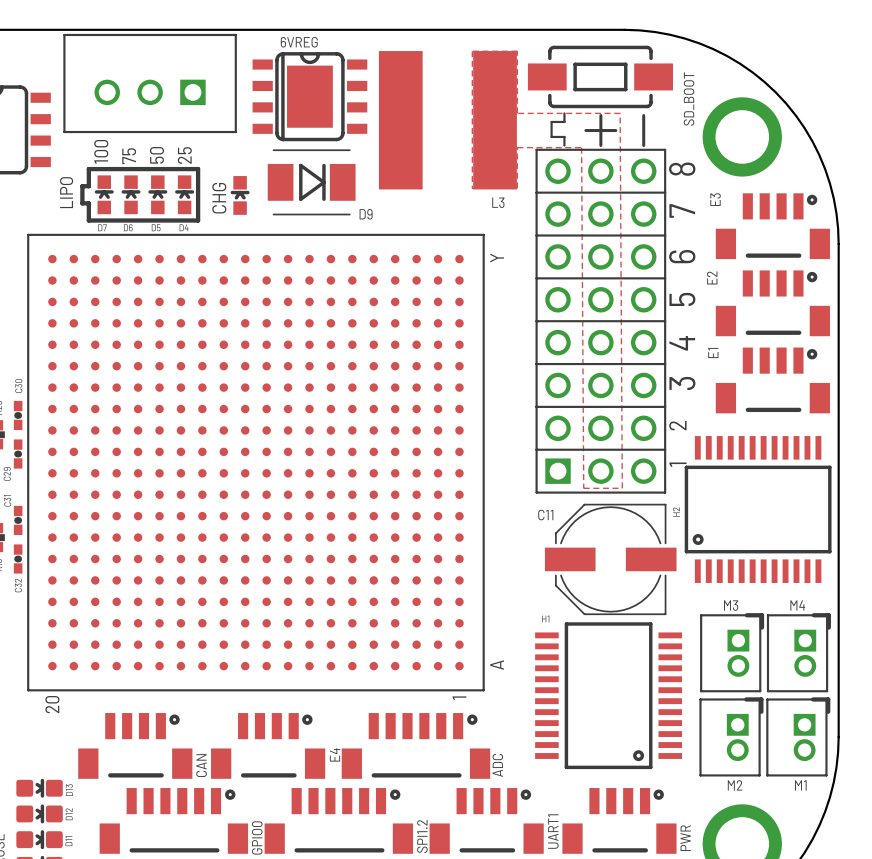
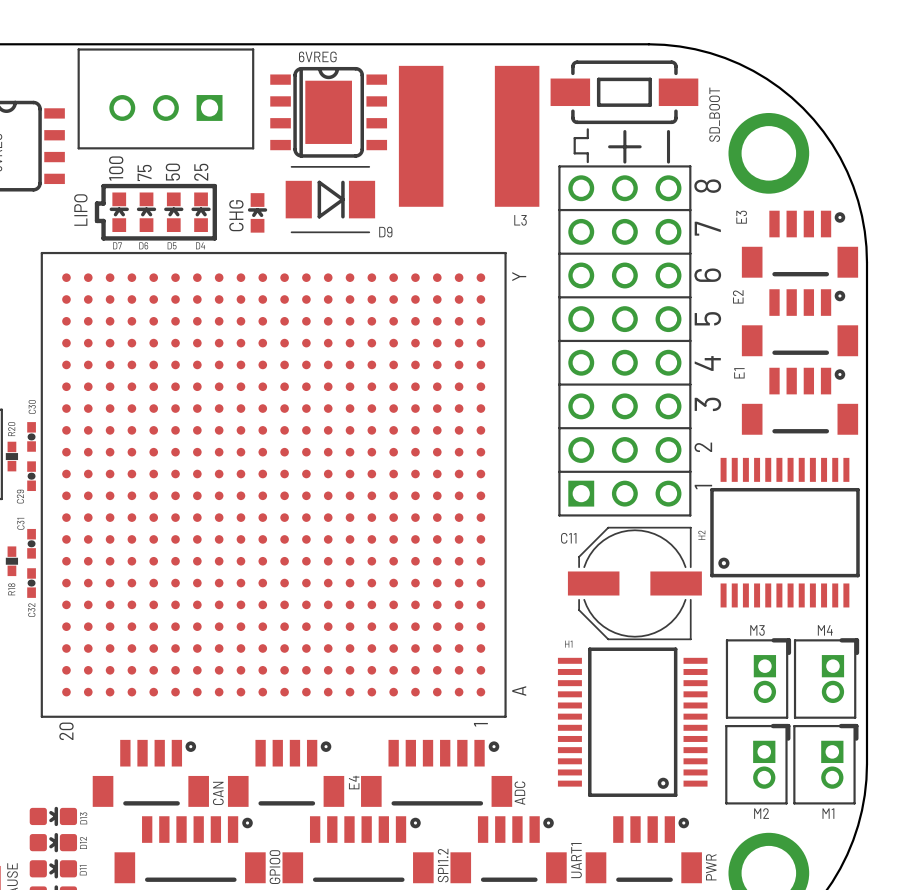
zone outline: (472, 51) (517, 51) (517, 113) (620, 113) (622, 488) (583, 488) (581, 147) (517, 147) (517, 188) (472, 188) (472, 51) -> none

